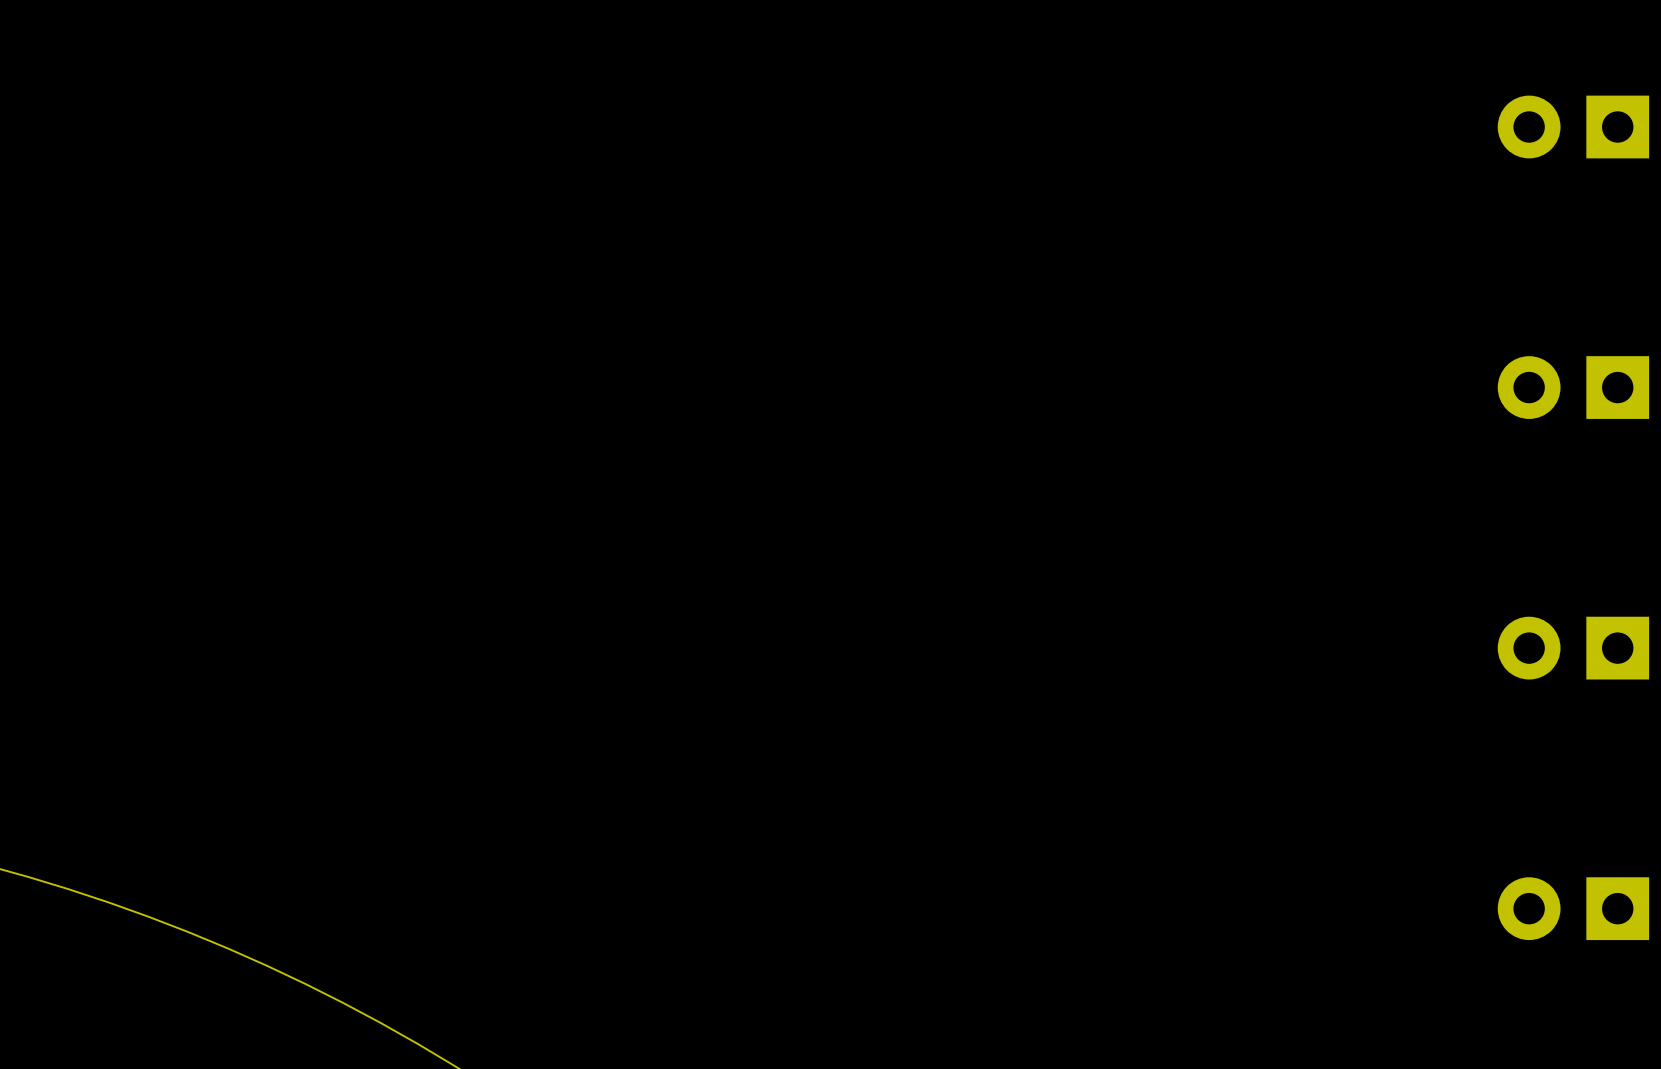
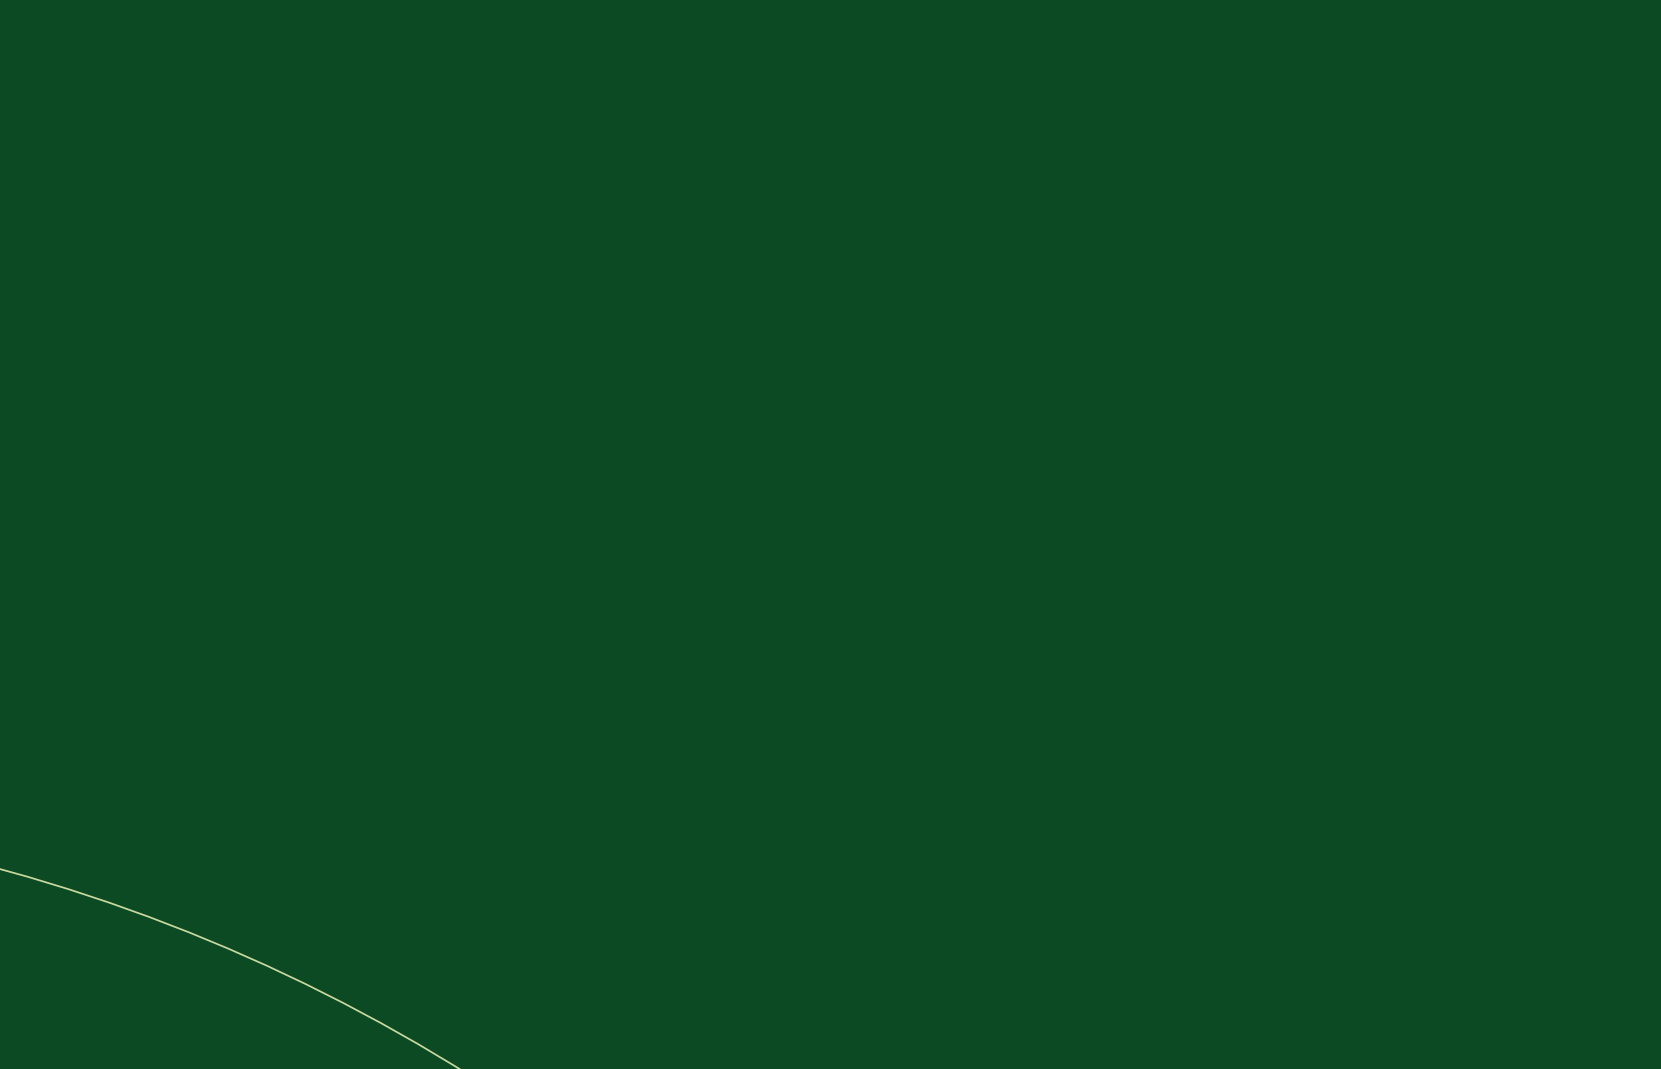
part: (1573, 126) -> none
part: (1573, 387) -> none
part: (1573, 648) -> none
part: (1573, 908) -> none

